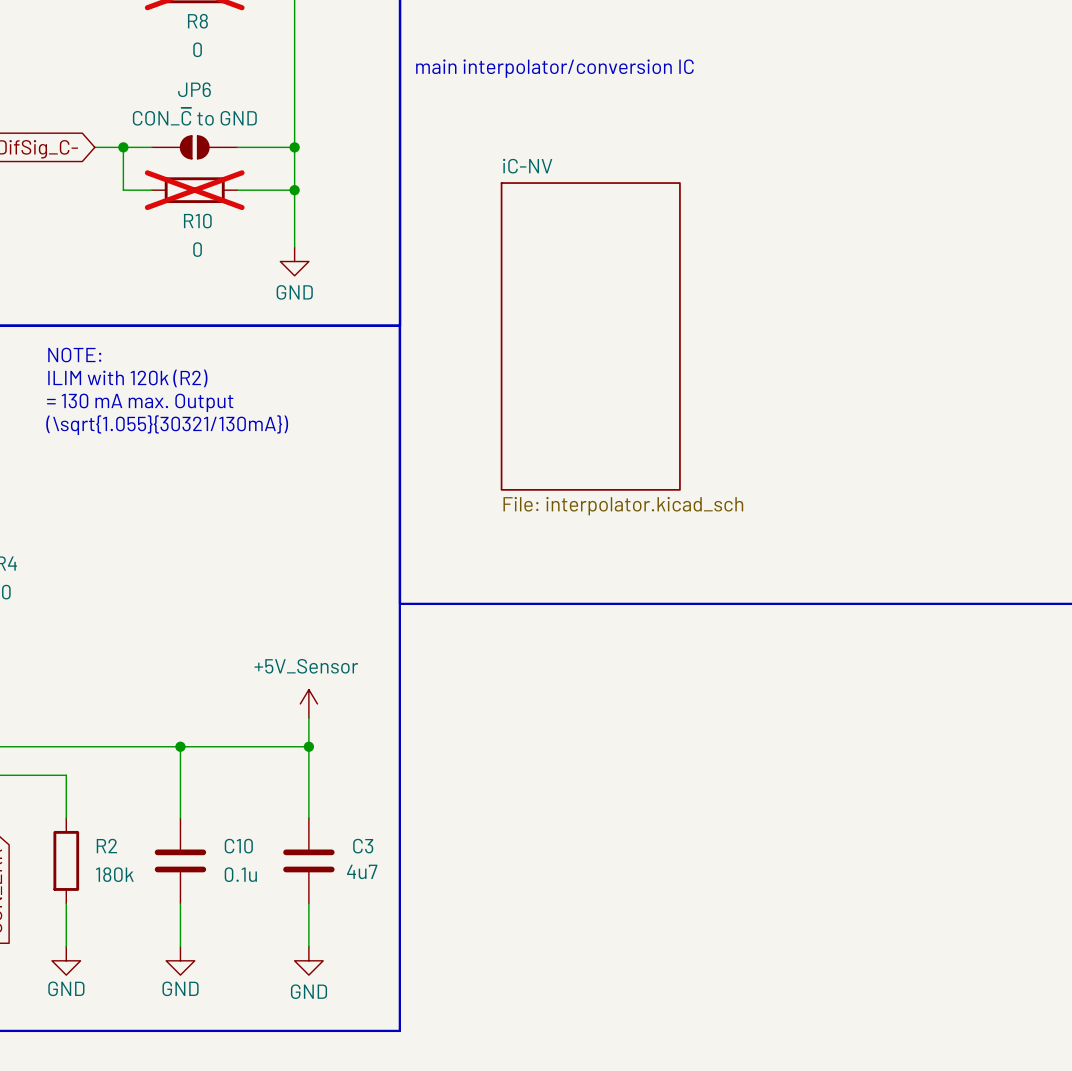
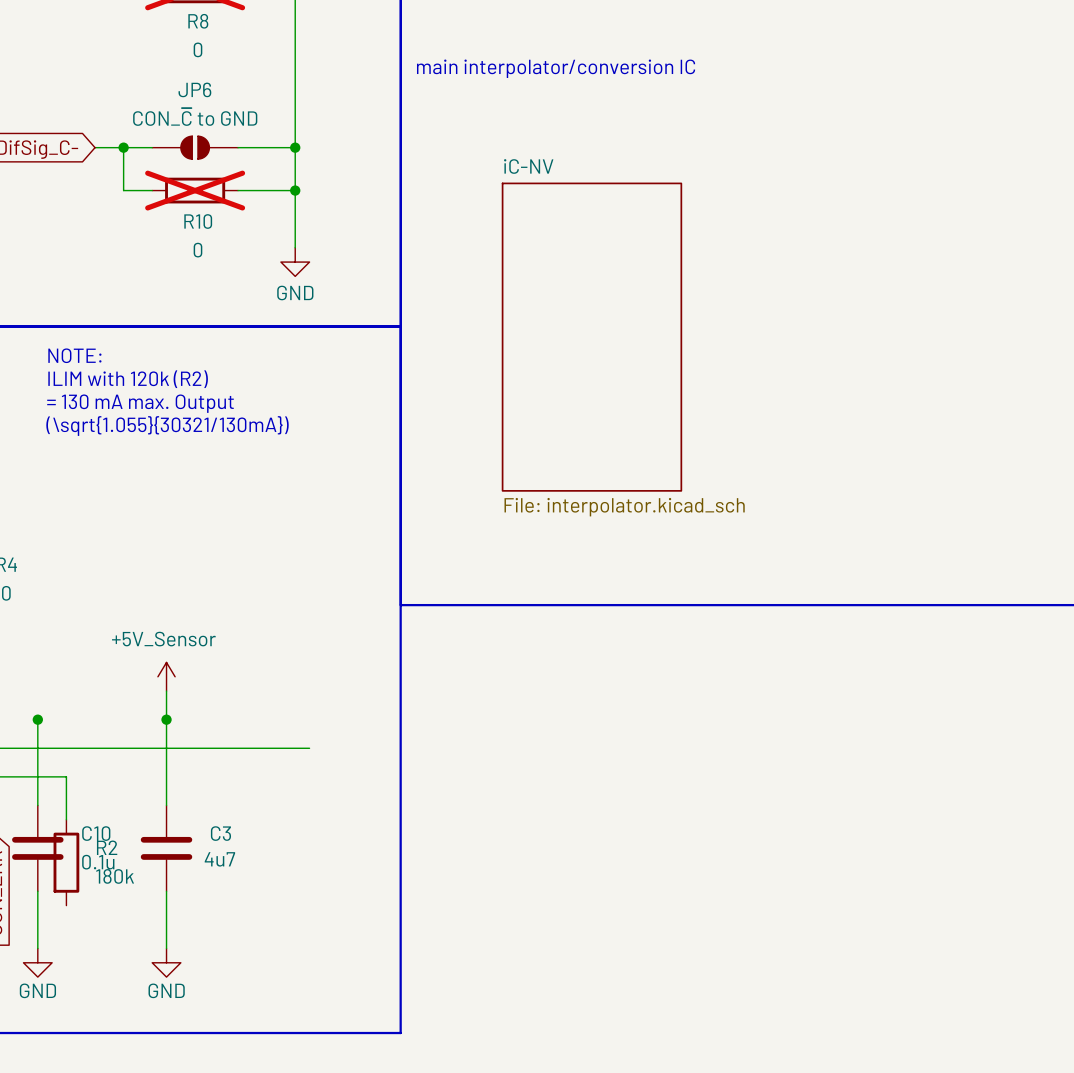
wire: none -> (166, 691) (166, 805)
power symbol position: +5V_Sensor (308, 703) -> +5V_Sensor (166, 676)
wire: none -> (37, 719) (37, 805)
junction: none -> (37, 719)
wire: (308, 718) (308, 818) -> none
wire: (180, 746) (180, 818) -> none
junction position: (180, 746) -> (166, 719)
junction: (308, 746) -> none
C10 position: (180, 860) -> (37, 848)
C3 position: (308, 860) -> (166, 848)
wire: none -> (37, 891) (37, 948)
wire: none -> (166, 891) (166, 948)
wire: (66, 903) (66, 946) -> none
wire: (180, 903) (180, 946) -> none
wire: (308, 903) (308, 946) -> none
power symbol position: GND (66, 960) -> GND (37, 962)
power symbol position: GND (180, 960) -> GND (166, 962)
power symbol: GND (308, 960) -> none

